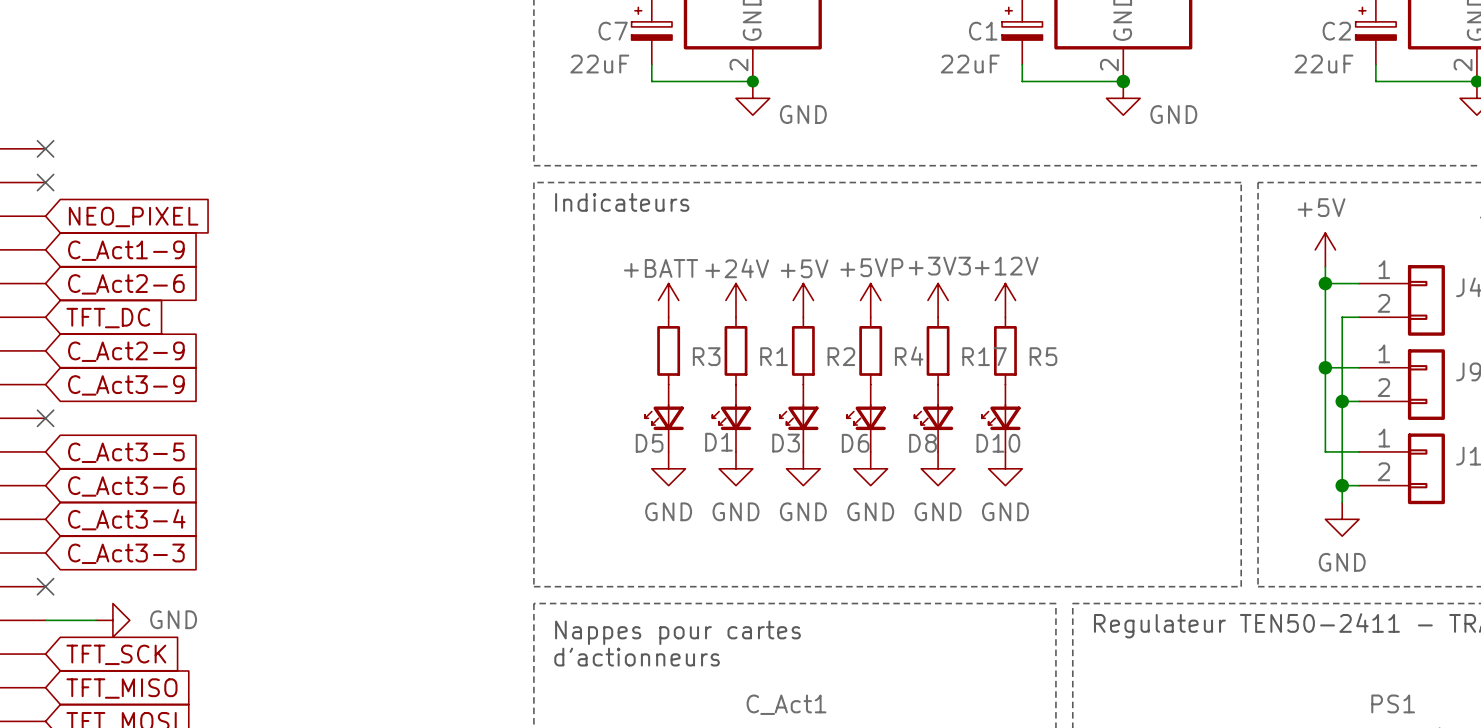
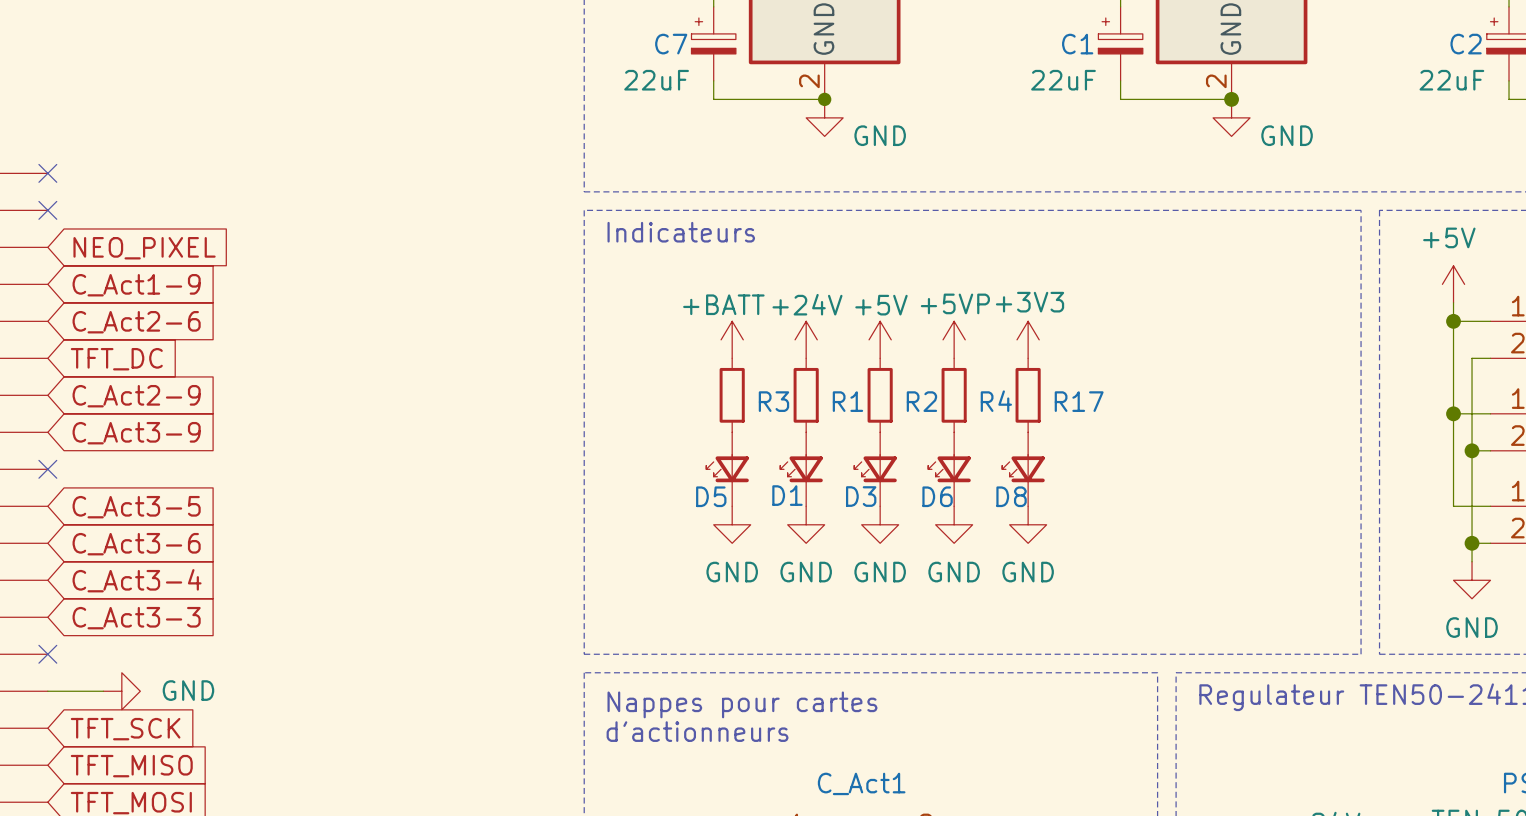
power symbol: +12V (1005, 300) -> none
R5: (1005, 350) -> none
D10: (1001, 418) -> none
power symbol: GND (1005, 468) -> none

